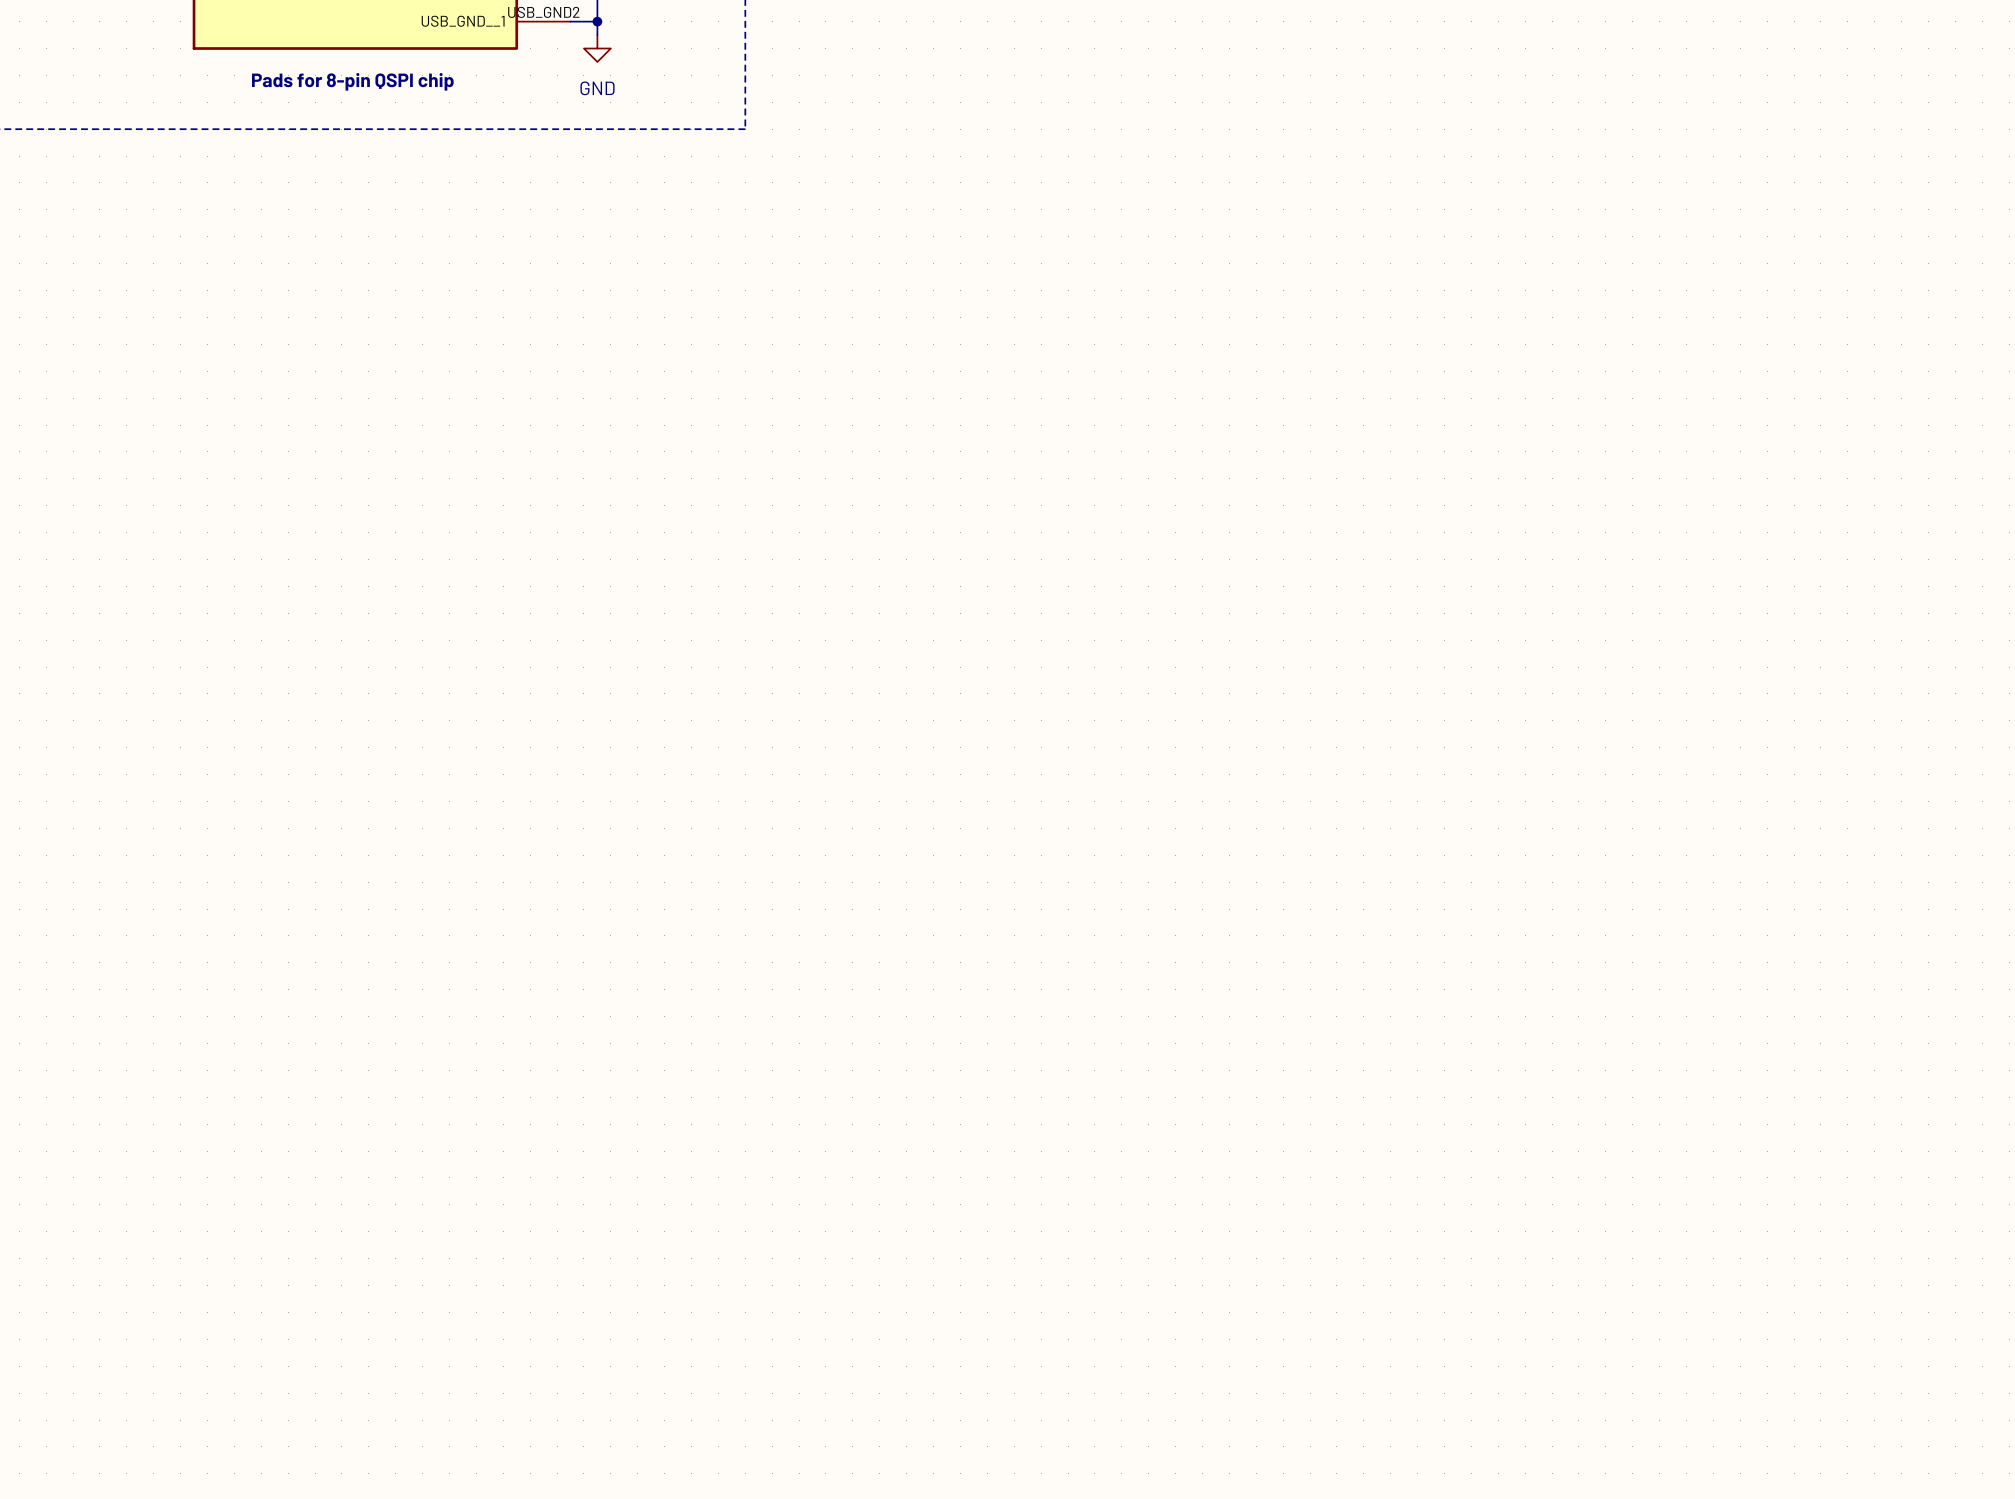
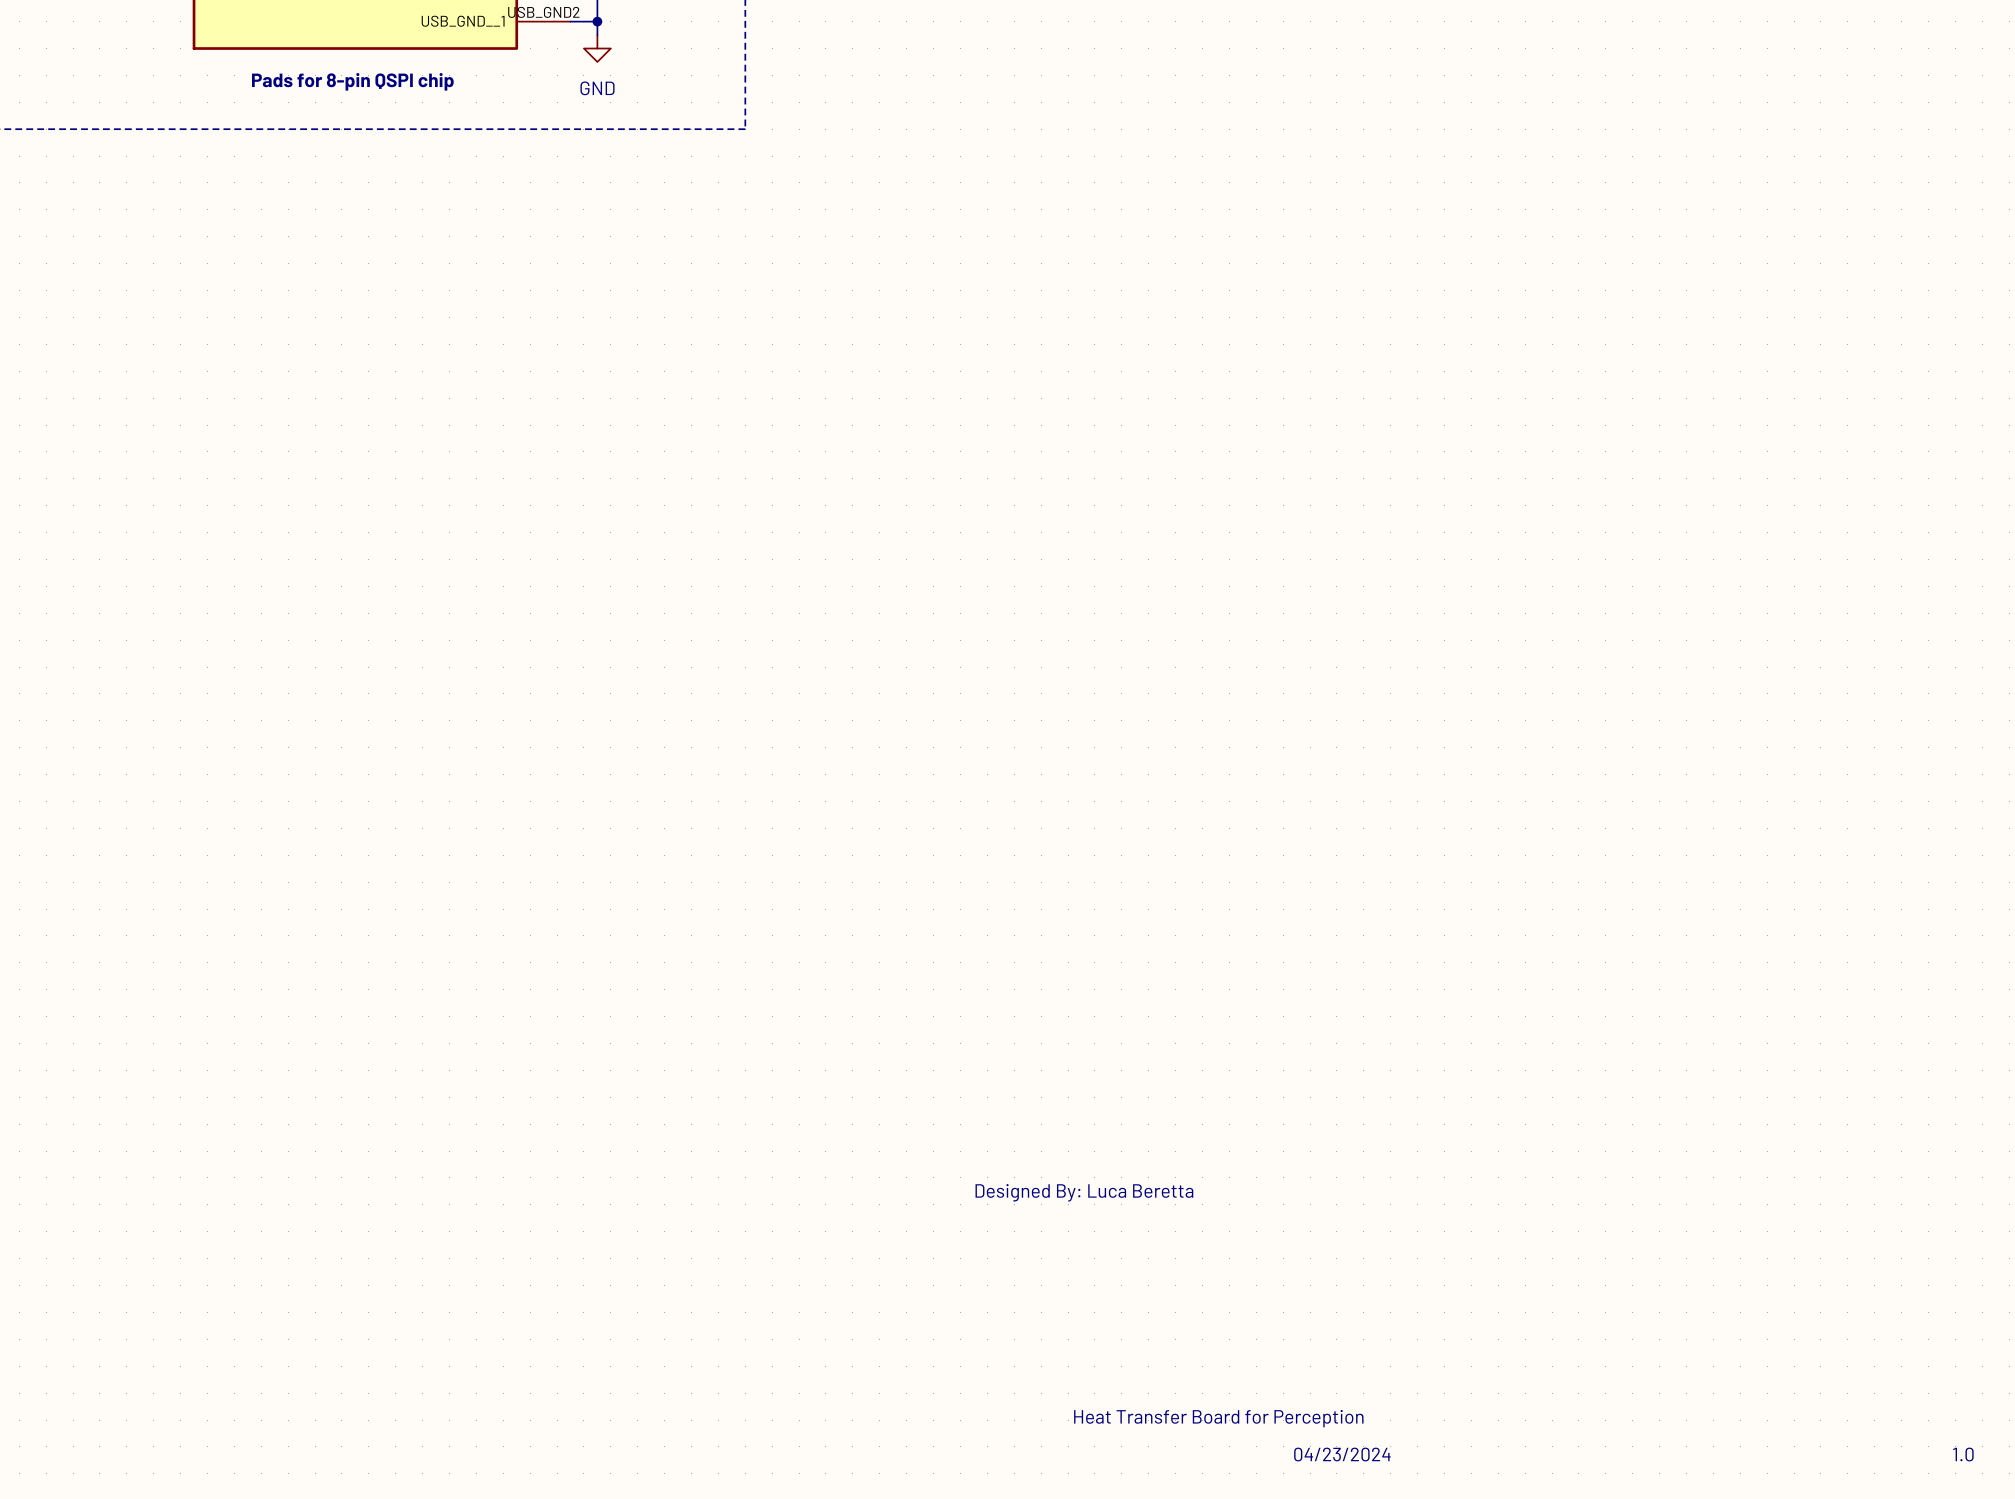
text: none -> Designed By: Luca Beretta (1084, 1192)
text: none -> Heat Transfer Board for Perception (1218, 1418)
text: none -> 04/23/2024 (1342, 1454)
text: none -> 1.0 (1963, 1454)

